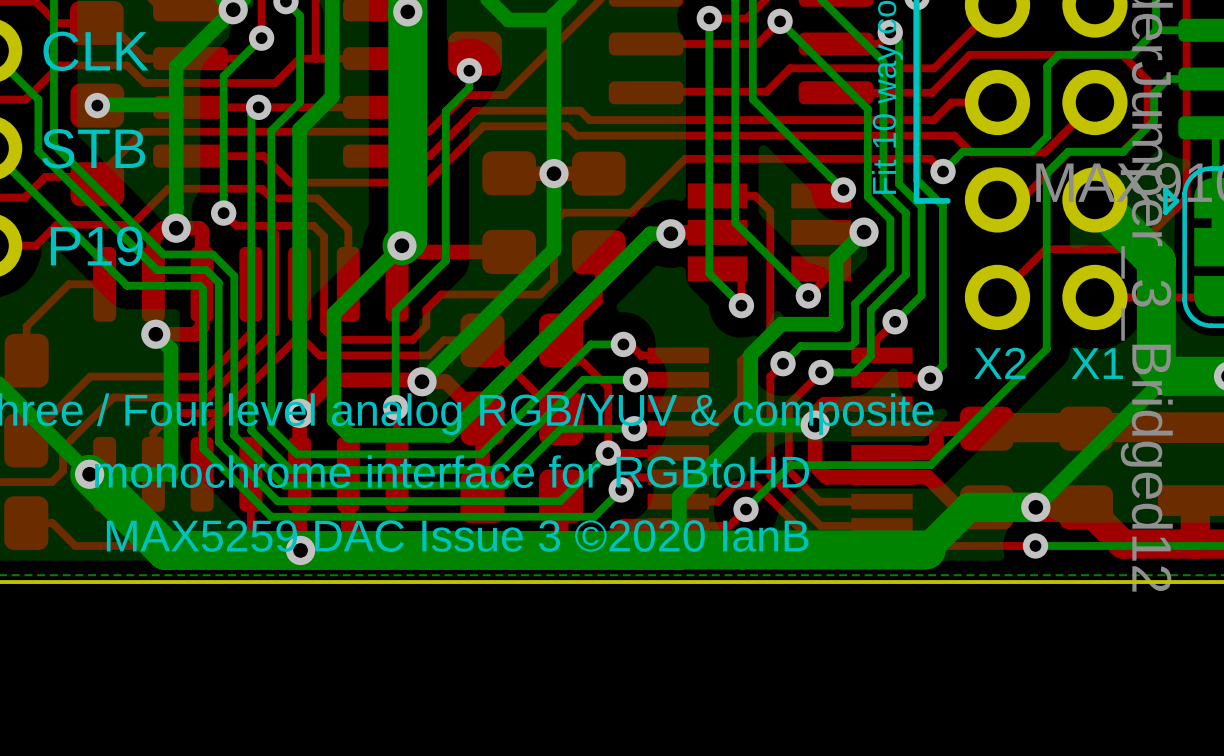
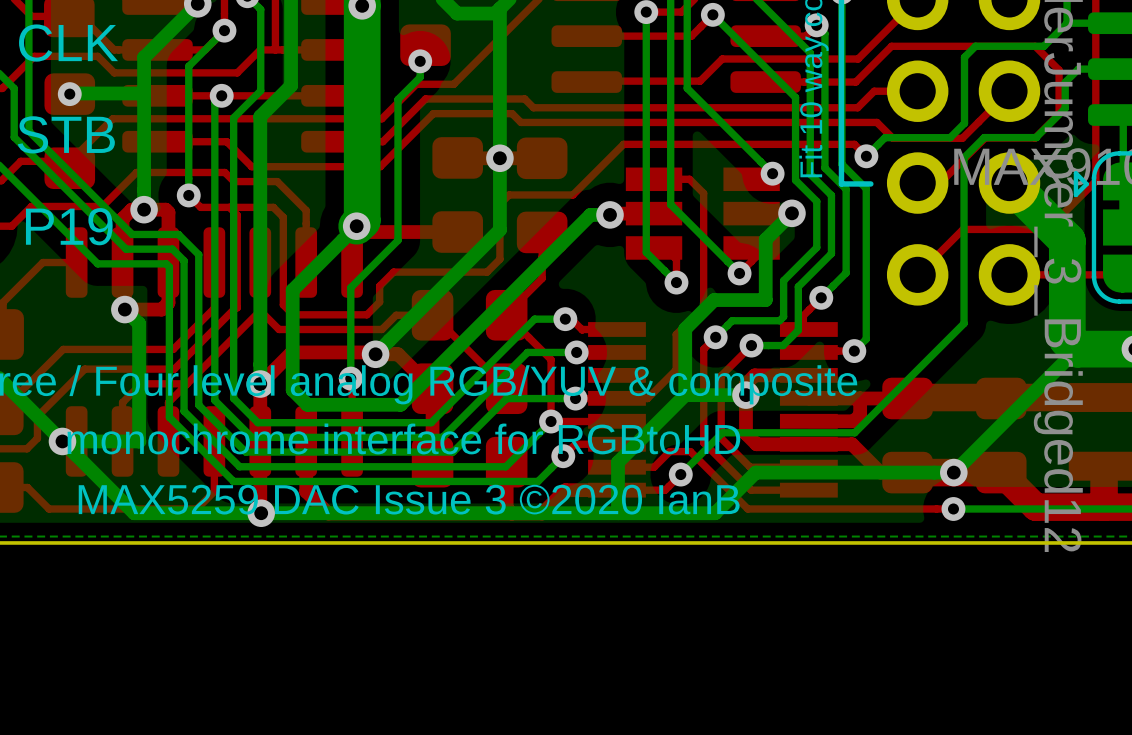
text: X2 (999, 363) -> none
text: X1 (1097, 363) -> none
bottom track width: thick (89, 474) (165, 550) (678, 550) -> thin (62, 441) (134, 513) (617, 513)
bottom track: (968, 507) (926, 549) (679, 549) -> (890, 472) (755, 472) (715, 513) (617, 513)
bottom track width: thick (1035, 507) (968, 507) -> thin (953, 472) (890, 472)

